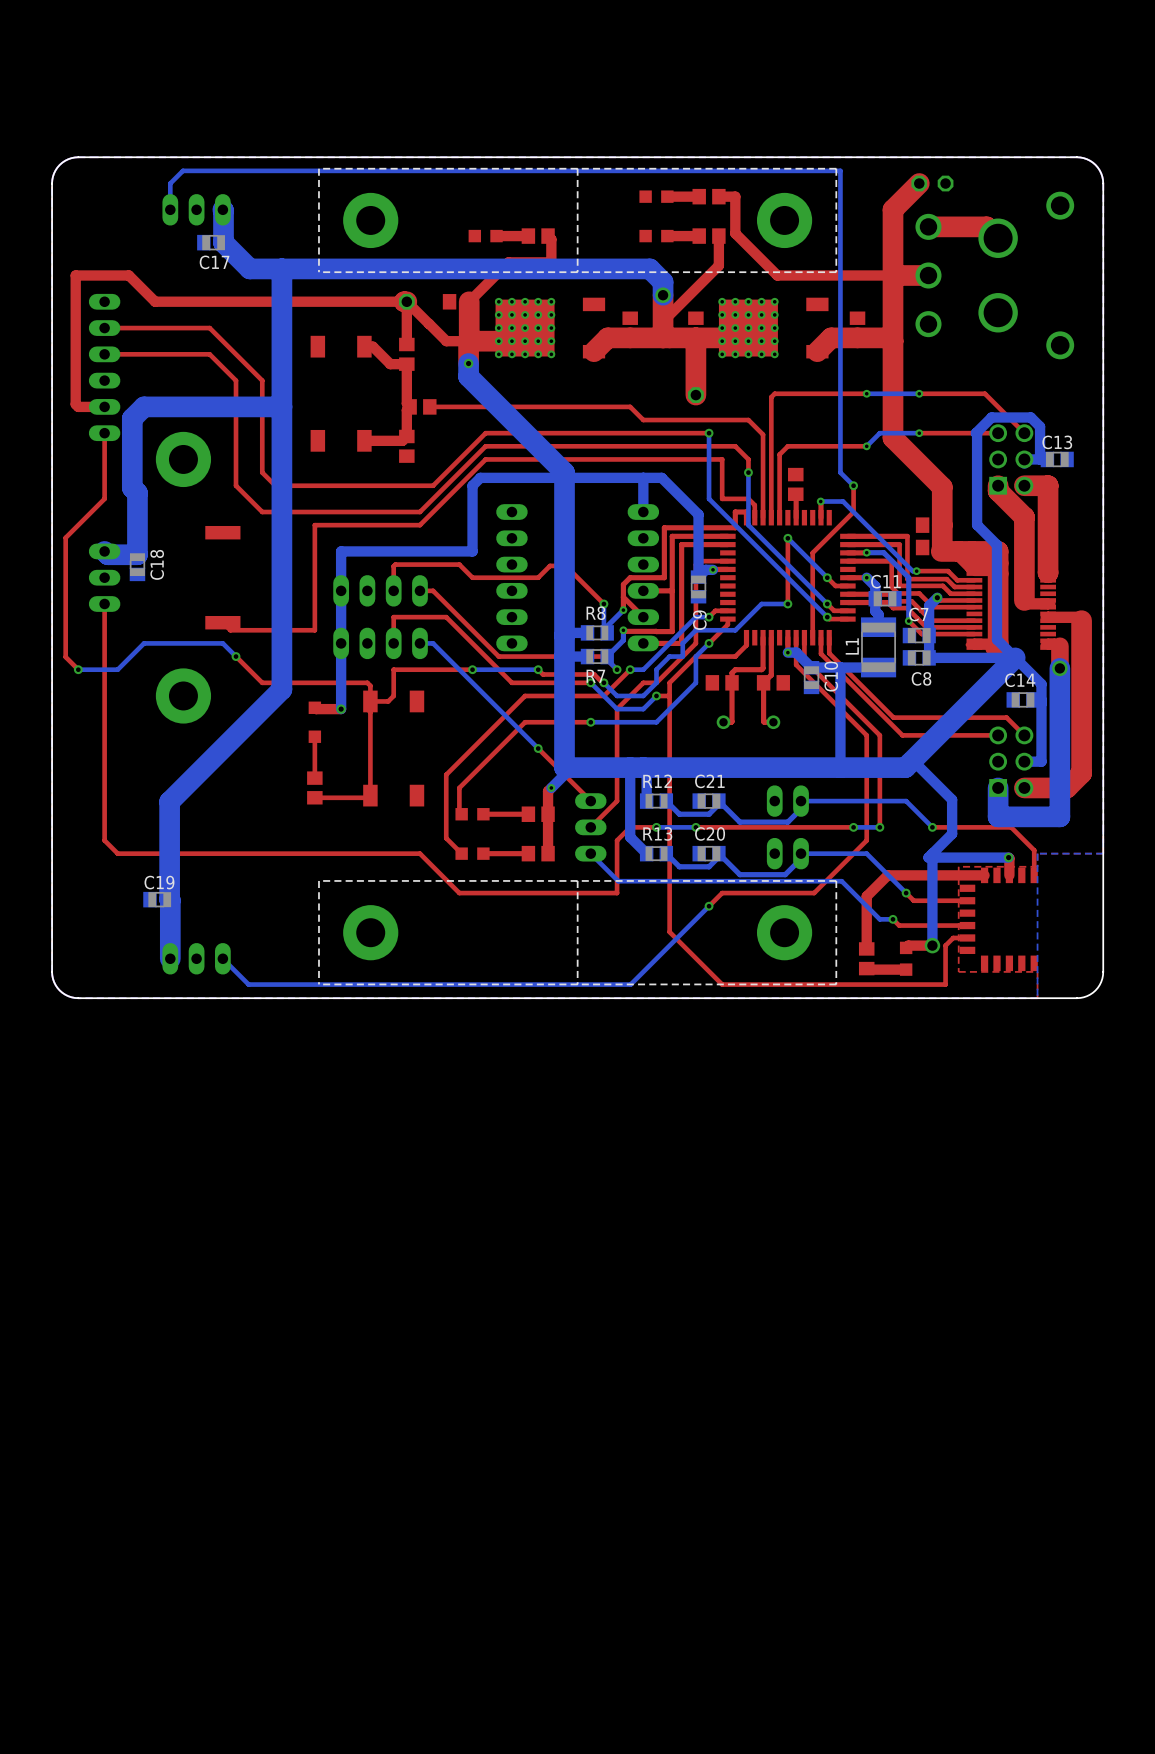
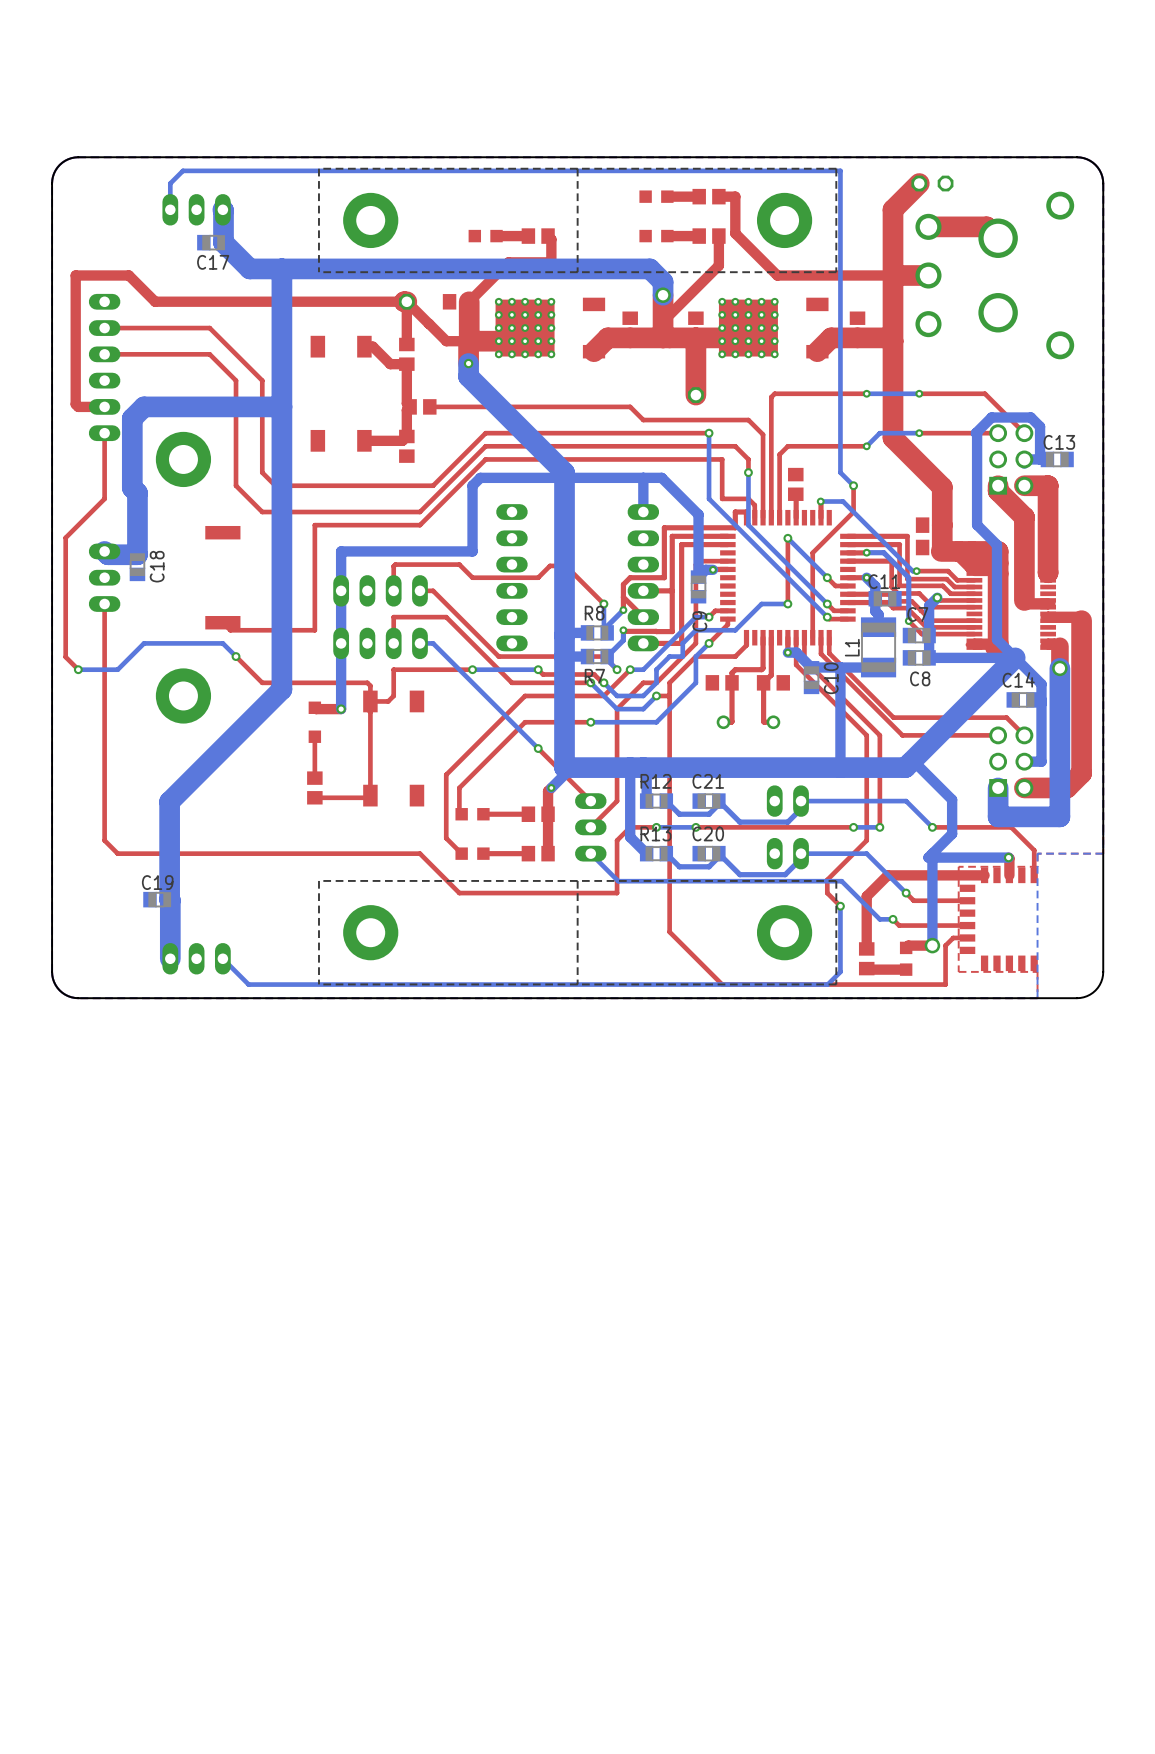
top track: (827, 879) (814, 893) (722, 893) (709, 906) -> (827, 879) (827, 893) (840, 906)
bottom track: (709, 906) (630, 984) -> (840, 906) (840, 971) (827, 984) (630, 984)
via: (709, 906) -> none
via: none -> (840, 906)

